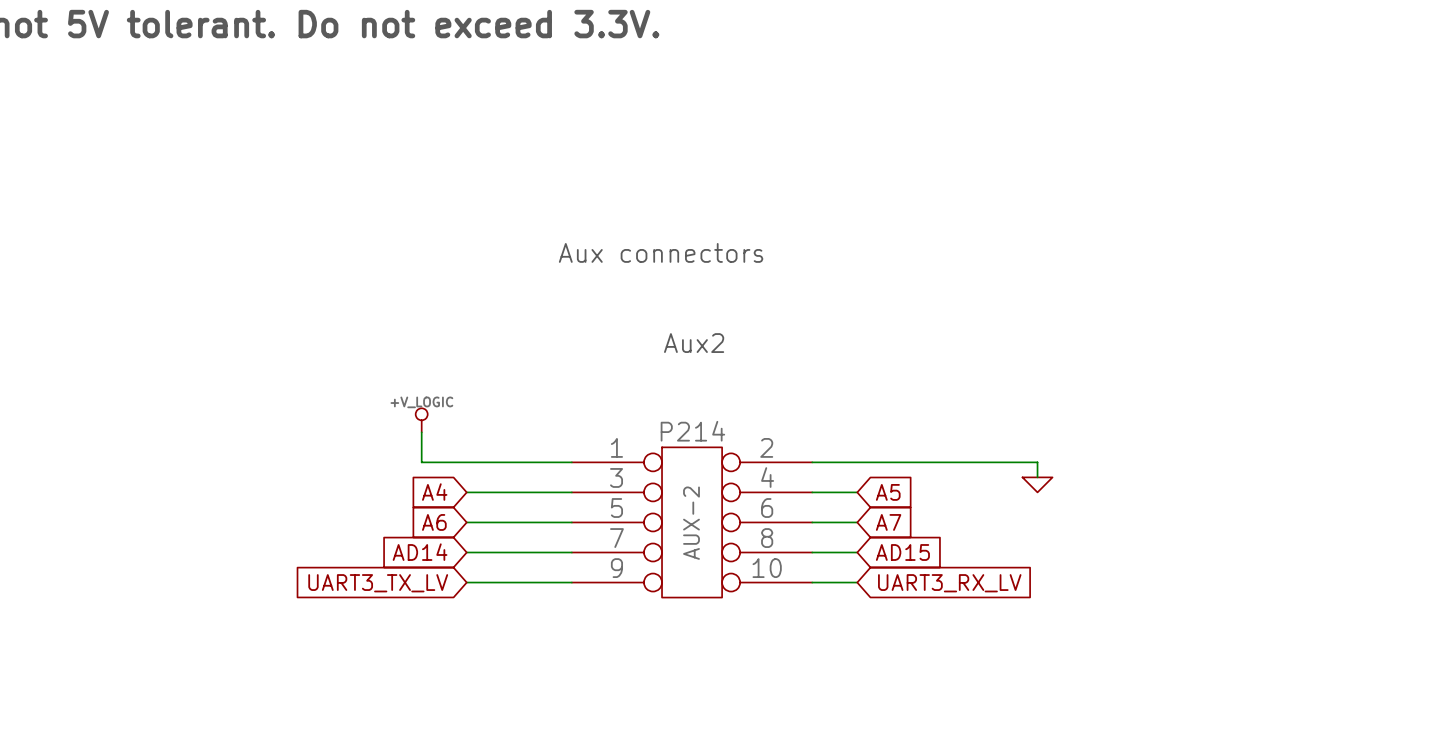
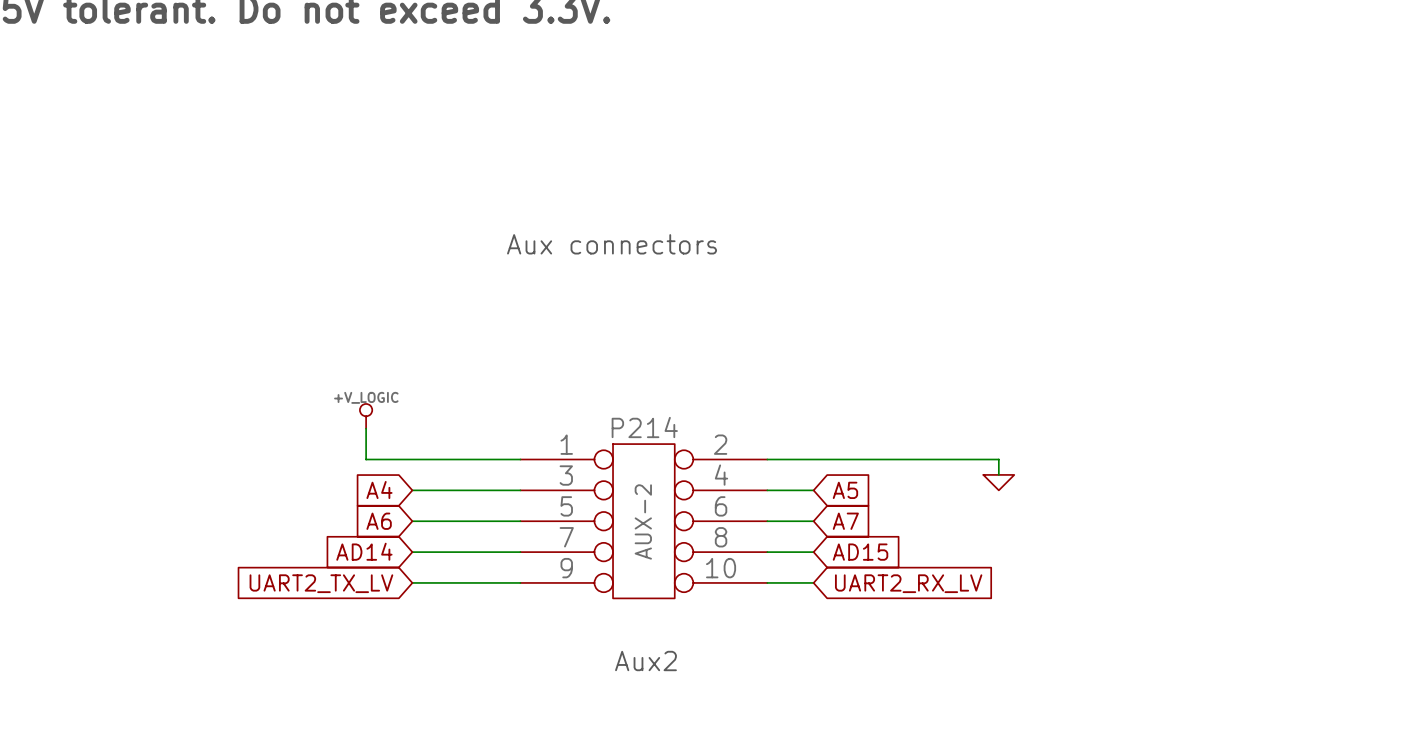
text: Aux2 (694, 343) -> none
global label: UART3_TX_LV (378, 583) -> UART2_TX_LV (321, 583)
global label: UART3_RX_LV (949, 583) -> UART2_RX_LV (908, 583)
text: none -> Aux2 (645, 661)

